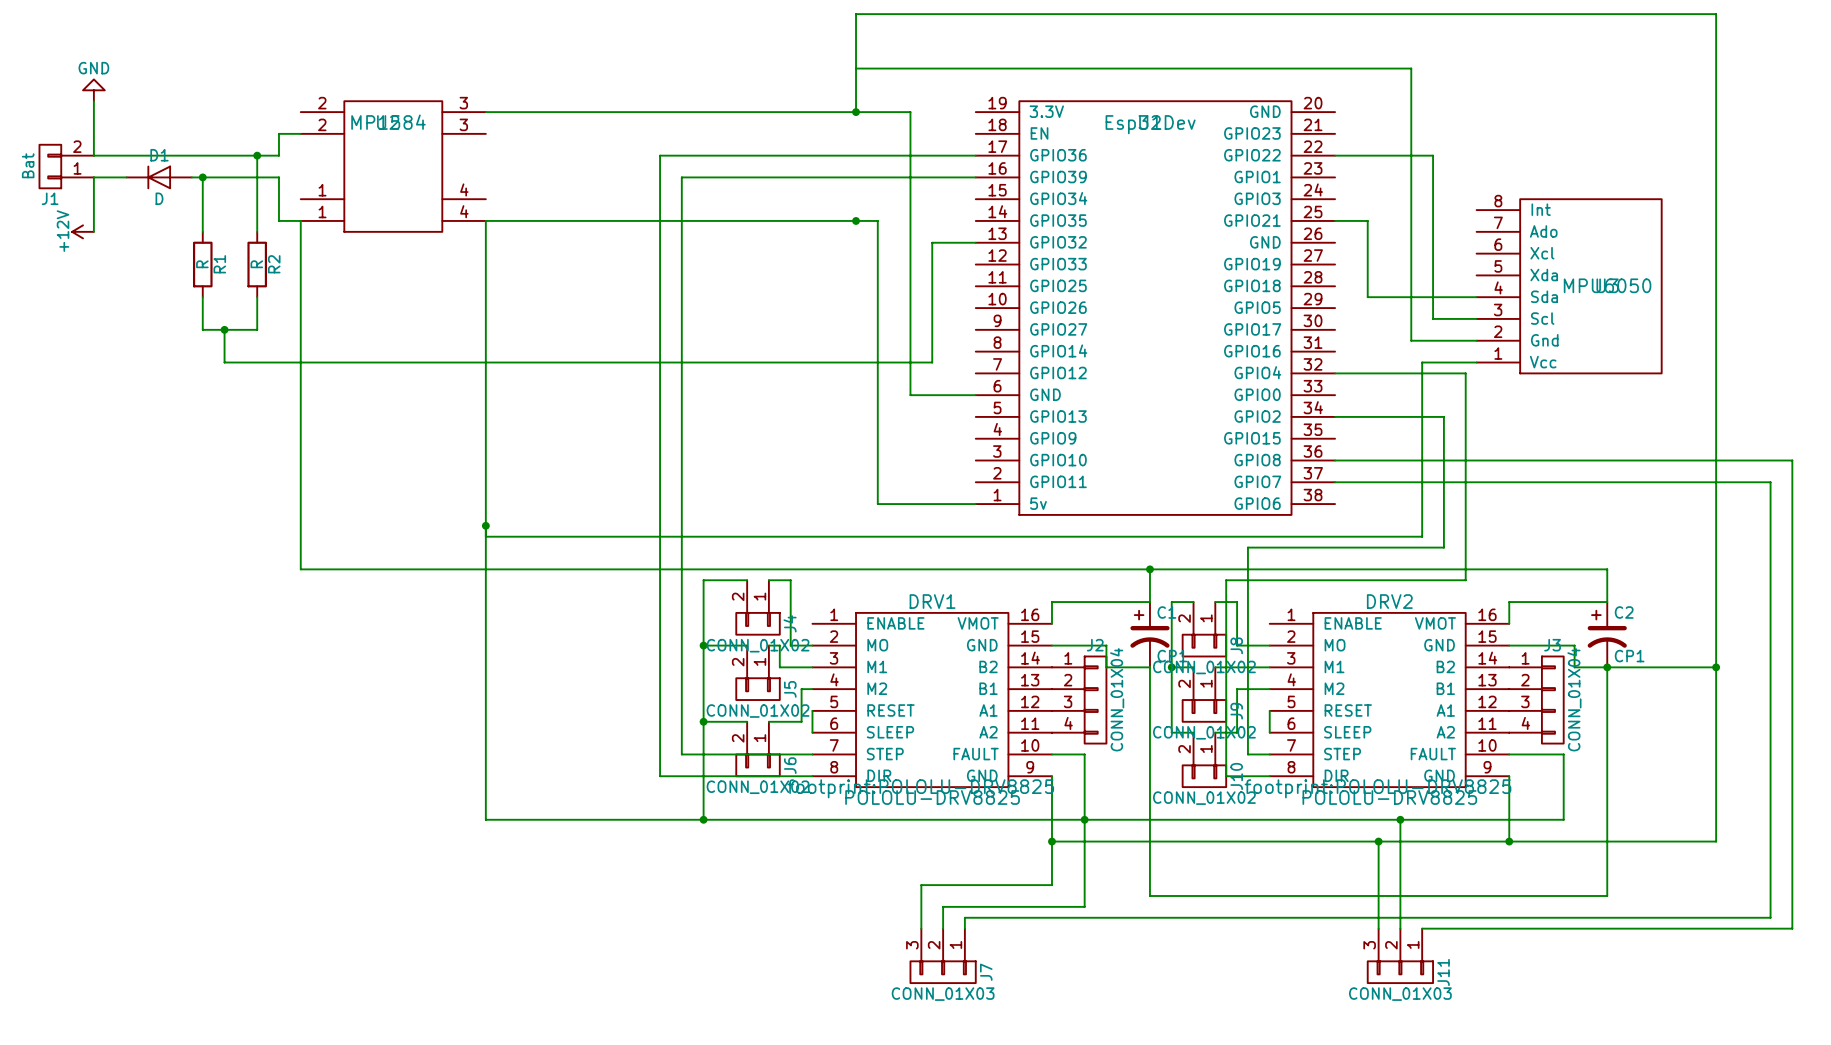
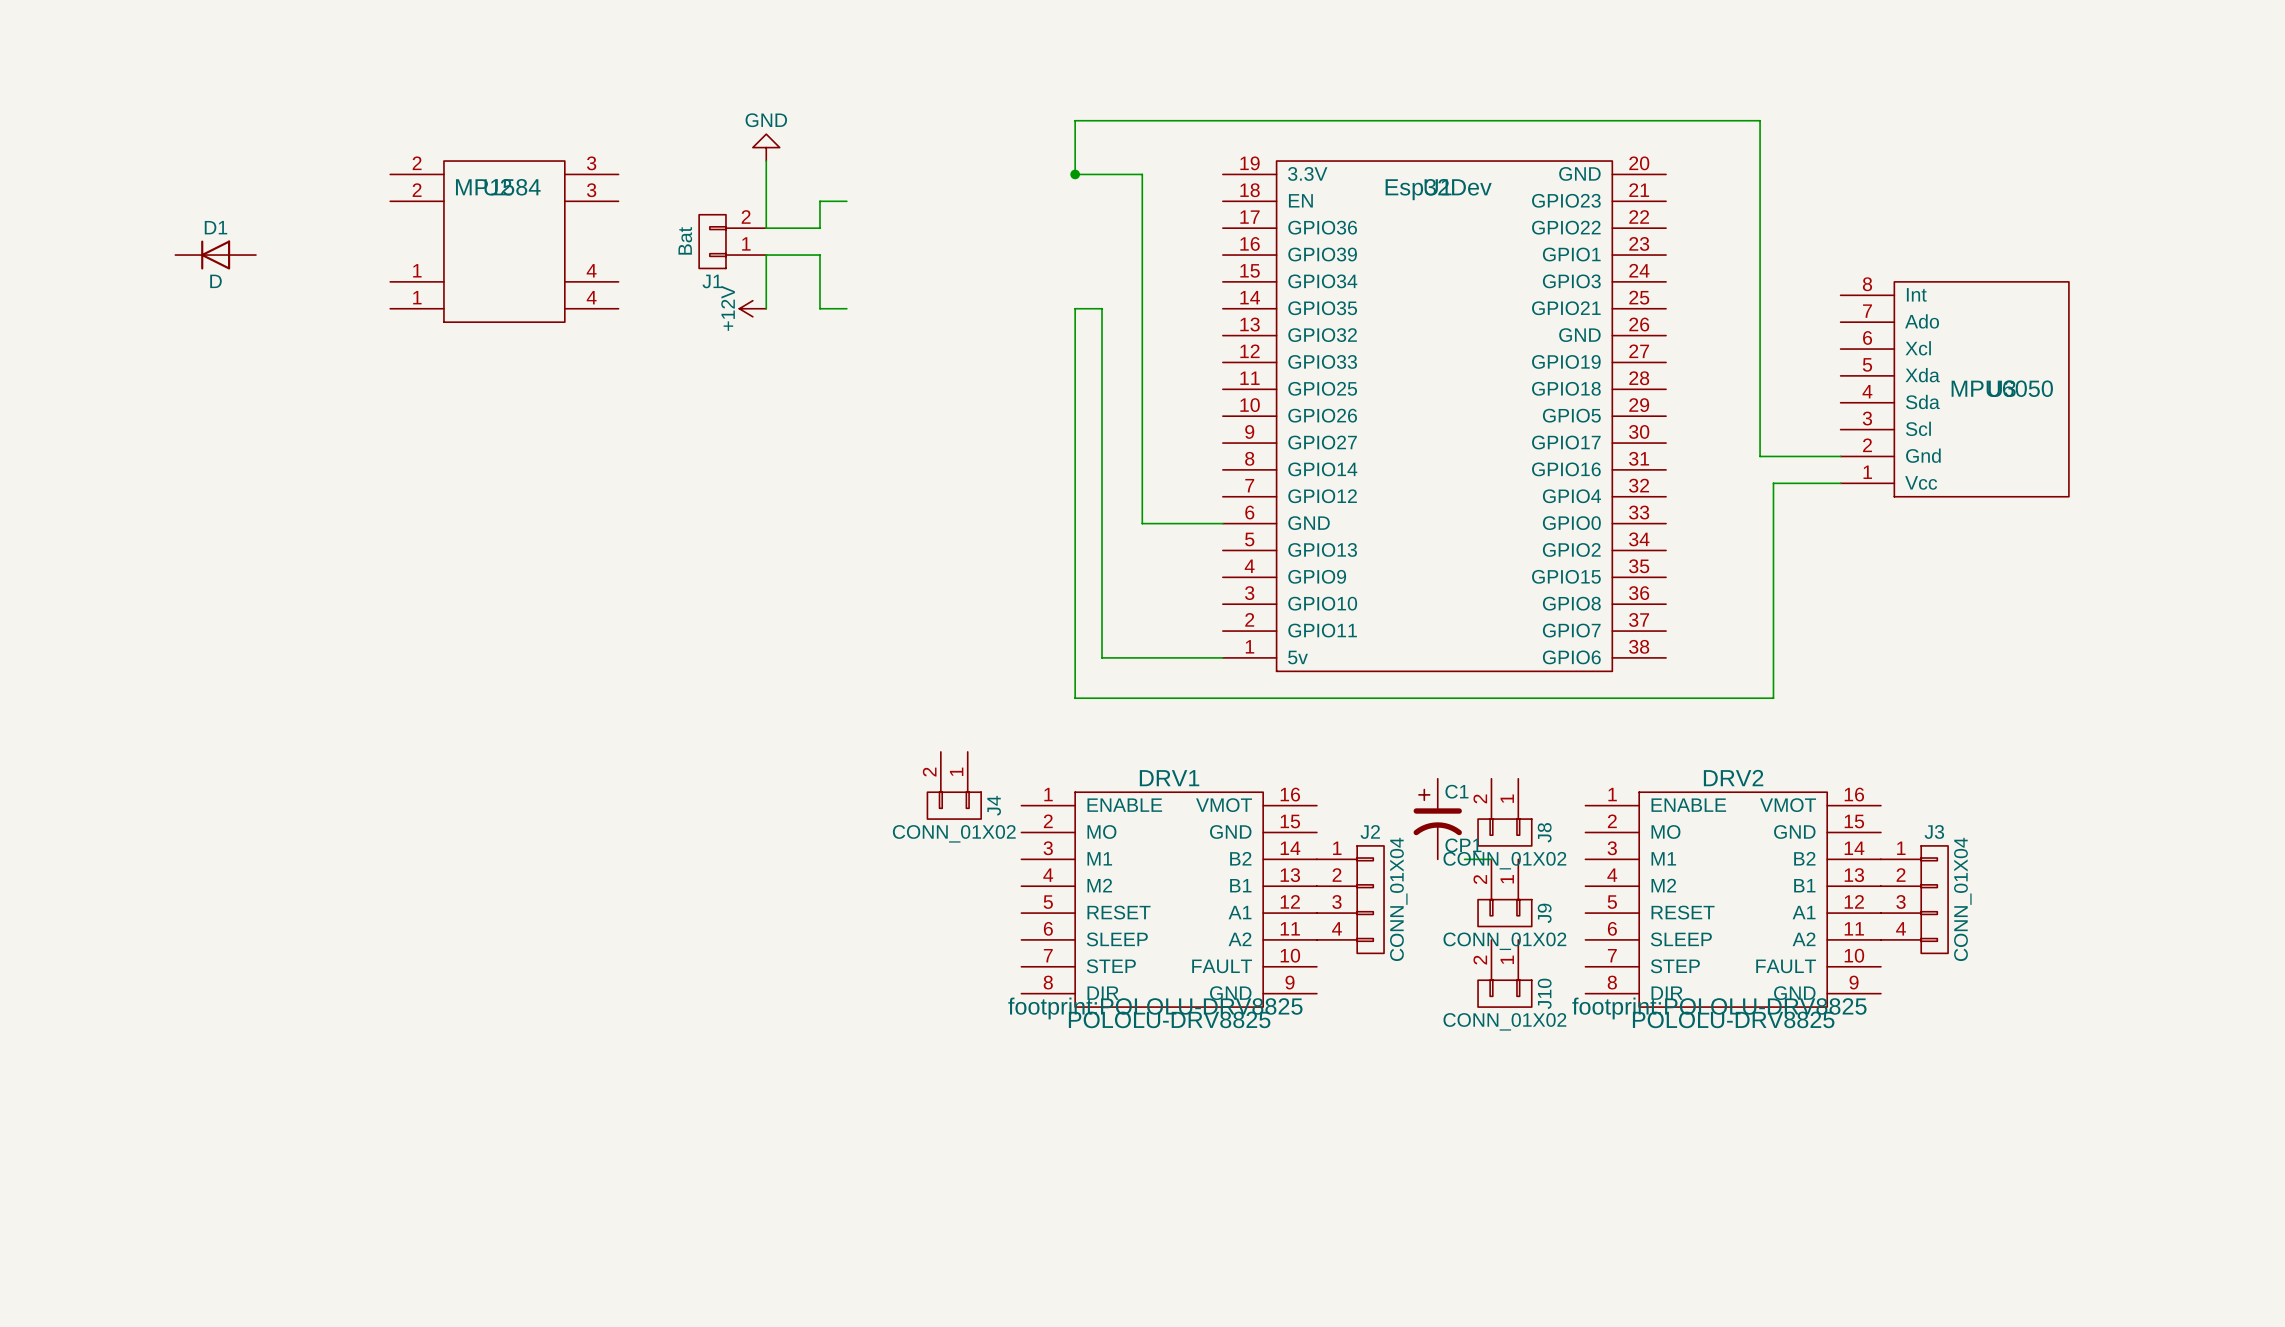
wire: (856, 68) (856, 14) (1716, 14) (1716, 841) (1051, 841) -> none
power symbol: GND (93, 90) -> none
power symbol: none -> GND (766, 147)
wire: (93, 101) (93, 155) (278, 155) (278, 133) (300, 133) -> none
wire: none -> (766, 161) (766, 228) (819, 228) (819, 201) (846, 201)
wire: (485, 112) (856, 112) -> none
wire: (257, 155) (257, 231) -> none
junction: (257, 155) -> none
wire: (975, 155) (660, 155) (660, 776) (812, 776) -> none
wire: (1335, 155) (1433, 155) (1433, 318) (1476, 318) -> none
J1 position: (66, 166) -> (732, 241)
wire: (126, 177) (93, 177) (93, 231) -> none
wire: (191, 177) (278, 177) (278, 220) (300, 220) (300, 569) (1607, 569) (1607, 602) (1509, 602) (1509, 623) -> none
wire: (202, 177) (202, 231) -> none
junction: (202, 177) -> none
wire: (975, 177) (681, 177) (681, 754) (812, 754) -> none
power symbol: none -> +12V (752, 308)
wire: (649, 220) (485, 220) (485, 819) (1563, 819) (1563, 754) (1509, 754) -> (819, 308) (819, 255) (766, 255) (766, 308)
wire: (670, 220) (856, 220) -> (1075, 698) (1075, 308)
junction: (856, 220) -> none
wire: (1335, 220) (1367, 220) (1367, 297) (1476, 297) -> none
power symbol: +12V (83, 231) -> none
wire: (975, 242) (932, 242) (932, 362) (224, 362) (224, 329) -> none
R1: R (202, 264) -> none
R2: R (257, 264) -> none
wire: (202, 297) (202, 329) (257, 329) (257, 297) -> none
junction: (224, 329) -> none
wire: (1335, 373) (1465, 373) (1465, 580) (1226, 580) (1226, 776) (1269, 776) -> none
wire: (1335, 416) (1443, 416) (1443, 547) (1247, 547) (1247, 754) (1269, 754) -> none
wire: (1335, 460) (1792, 460) (1792, 928) (1422, 928) -> none
wire: (1335, 482) (1770, 482) (1770, 917) (964, 917) (964, 928) -> none
junction: (485, 525) -> none
wire: (485, 536) (856, 536) -> none
wire: (1149, 569) (1149, 602) (1051, 602) (1051, 623) -> none
junction: (1149, 569) -> none
wire: (747, 580) (703, 580) (703, 819) -> none
wire: (768, 580) (790, 580) (790, 645) (812, 645) -> none
wire: (1193, 602) (1171, 602) (1171, 732) (1193, 732) -> none
wire: (1215, 602) (1237, 602) (1237, 645) (1269, 645) -> none
C2: CP1 (1607, 634) -> none
wire: (703, 645) (747, 645) -> none
junction: (703, 645) -> none
wire: (768, 645) (779, 645) (779, 667) (812, 667) -> none
wire: (1051, 645) (1106, 645) (1106, 667) (1149, 667) (1149, 895) (1607, 895) (1607, 667) -> none
wire: (1509, 645) (1574, 645) (1574, 667) (1716, 667) -> none
junction: (1171, 667) -> none
wire: (1215, 667) (1269, 667) -> none
junction: (1607, 667) -> none
junction: (1716, 667) -> none
J5: CONN_01X02 (758, 672) -> none
wire: (812, 689) (801, 689) (801, 721) (768, 721) -> none
wire: (1269, 689) (1237, 689) (1237, 732) (1215, 732) -> none
wire: (812, 710) (812, 732) -> none
wire: (1269, 710) (1269, 732) -> none
wire: (703, 721) (747, 721) -> none
junction: (703, 721) -> none
J6: CONN_01X02 (758, 749) -> none
wire: (1051, 754) (1084, 754) (1084, 906) (943, 906) (943, 928) -> none
wire: (1051, 776) (1051, 885) (921, 885) (921, 928) -> none
wire: (1509, 776) (1509, 841) -> none
junction: (703, 819) -> none
junction: (1084, 819) -> none
wire: (1400, 819) (1400, 928) -> none
junction: (1400, 819) -> none
junction: (1051, 841) -> none
wire: (1378, 841) (1378, 928) -> none
junction: (1378, 841) -> none
junction: (1509, 841) -> none
J7: CONN_01X03 (943, 955) -> none
J11: CONN_01X03 (1400, 955) -> none

